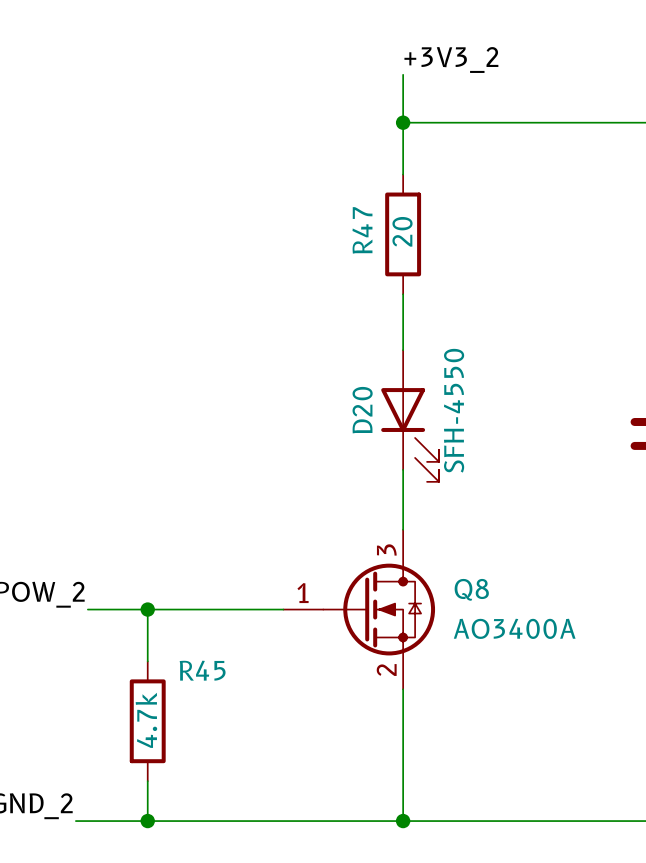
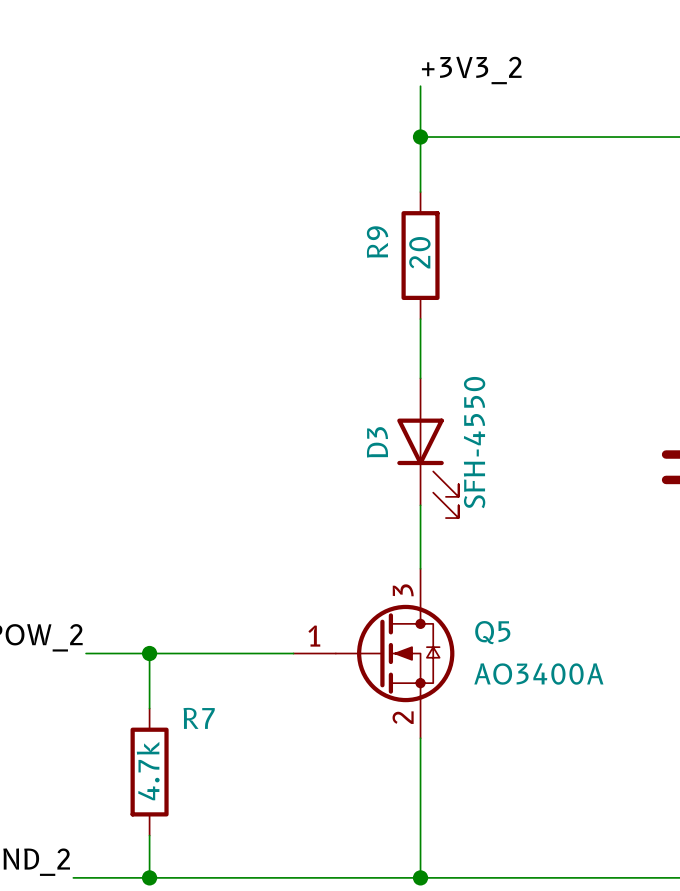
R47 name: R47 (362, 230) -> R9 (377, 242)
D20 name: D20 (362, 410) -> D3 (377, 442)
Q8 name: Q8 (471, 589) -> Q5 (492, 632)
R45 name: R45 (202, 670) -> R7 (199, 718)

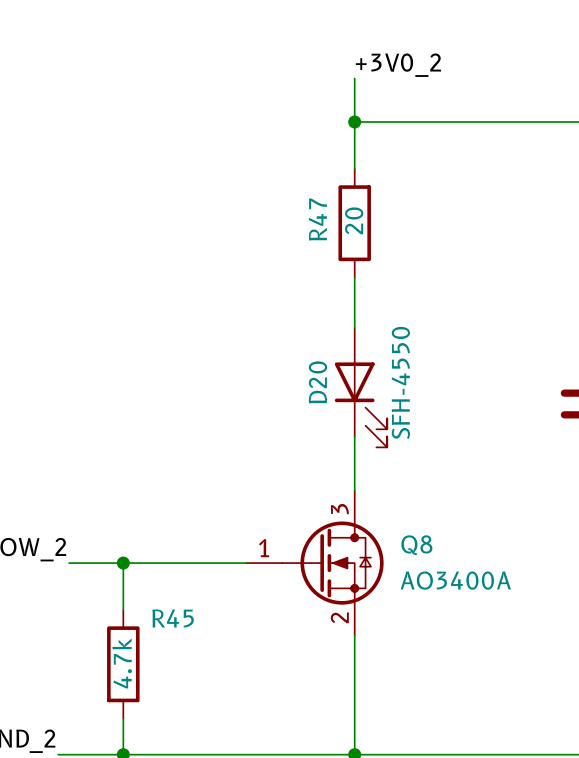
label: +3V3_2 (471, 70) -> +3V0_2 (398, 65)
R9 name: R9 (377, 242) -> R47 (317, 219)
D3 name: D3 (377, 442) -> D20 (317, 382)
Q5 name: Q5 (492, 632) -> Q8 (416, 545)
R7 name: R7 (199, 718) -> R45 (173, 618)

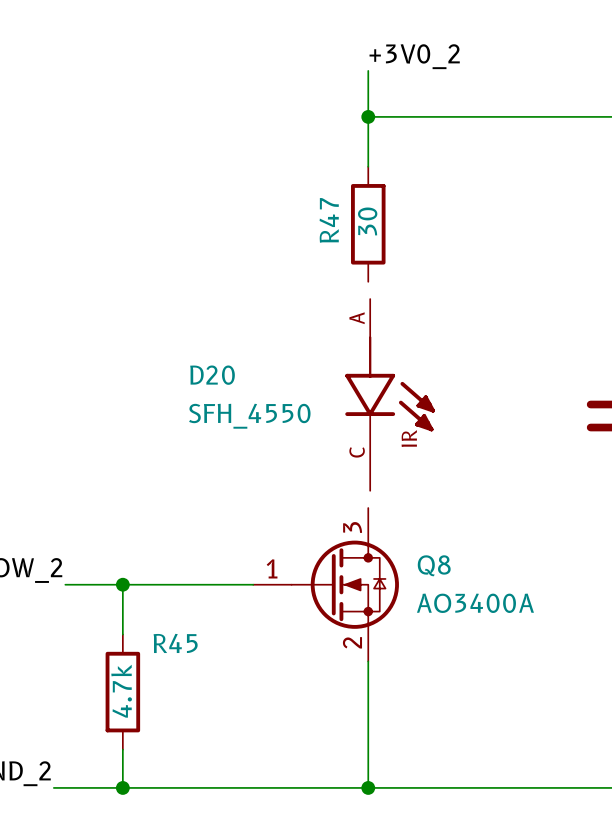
R47 value: 20 (354, 220) -> 30 (367, 221)
wire: (354, 277) (354, 328) -> none
D20 symbol: [334, 328, 388, 448] -> [345, 299, 435, 491]
D20 name position: D20 (317, 382) -> D20 (212, 375)
D20 value: SFH-4550 (400, 382) -> SFH_4550 (249, 416)
wire: (354, 436) (354, 490) -> none

